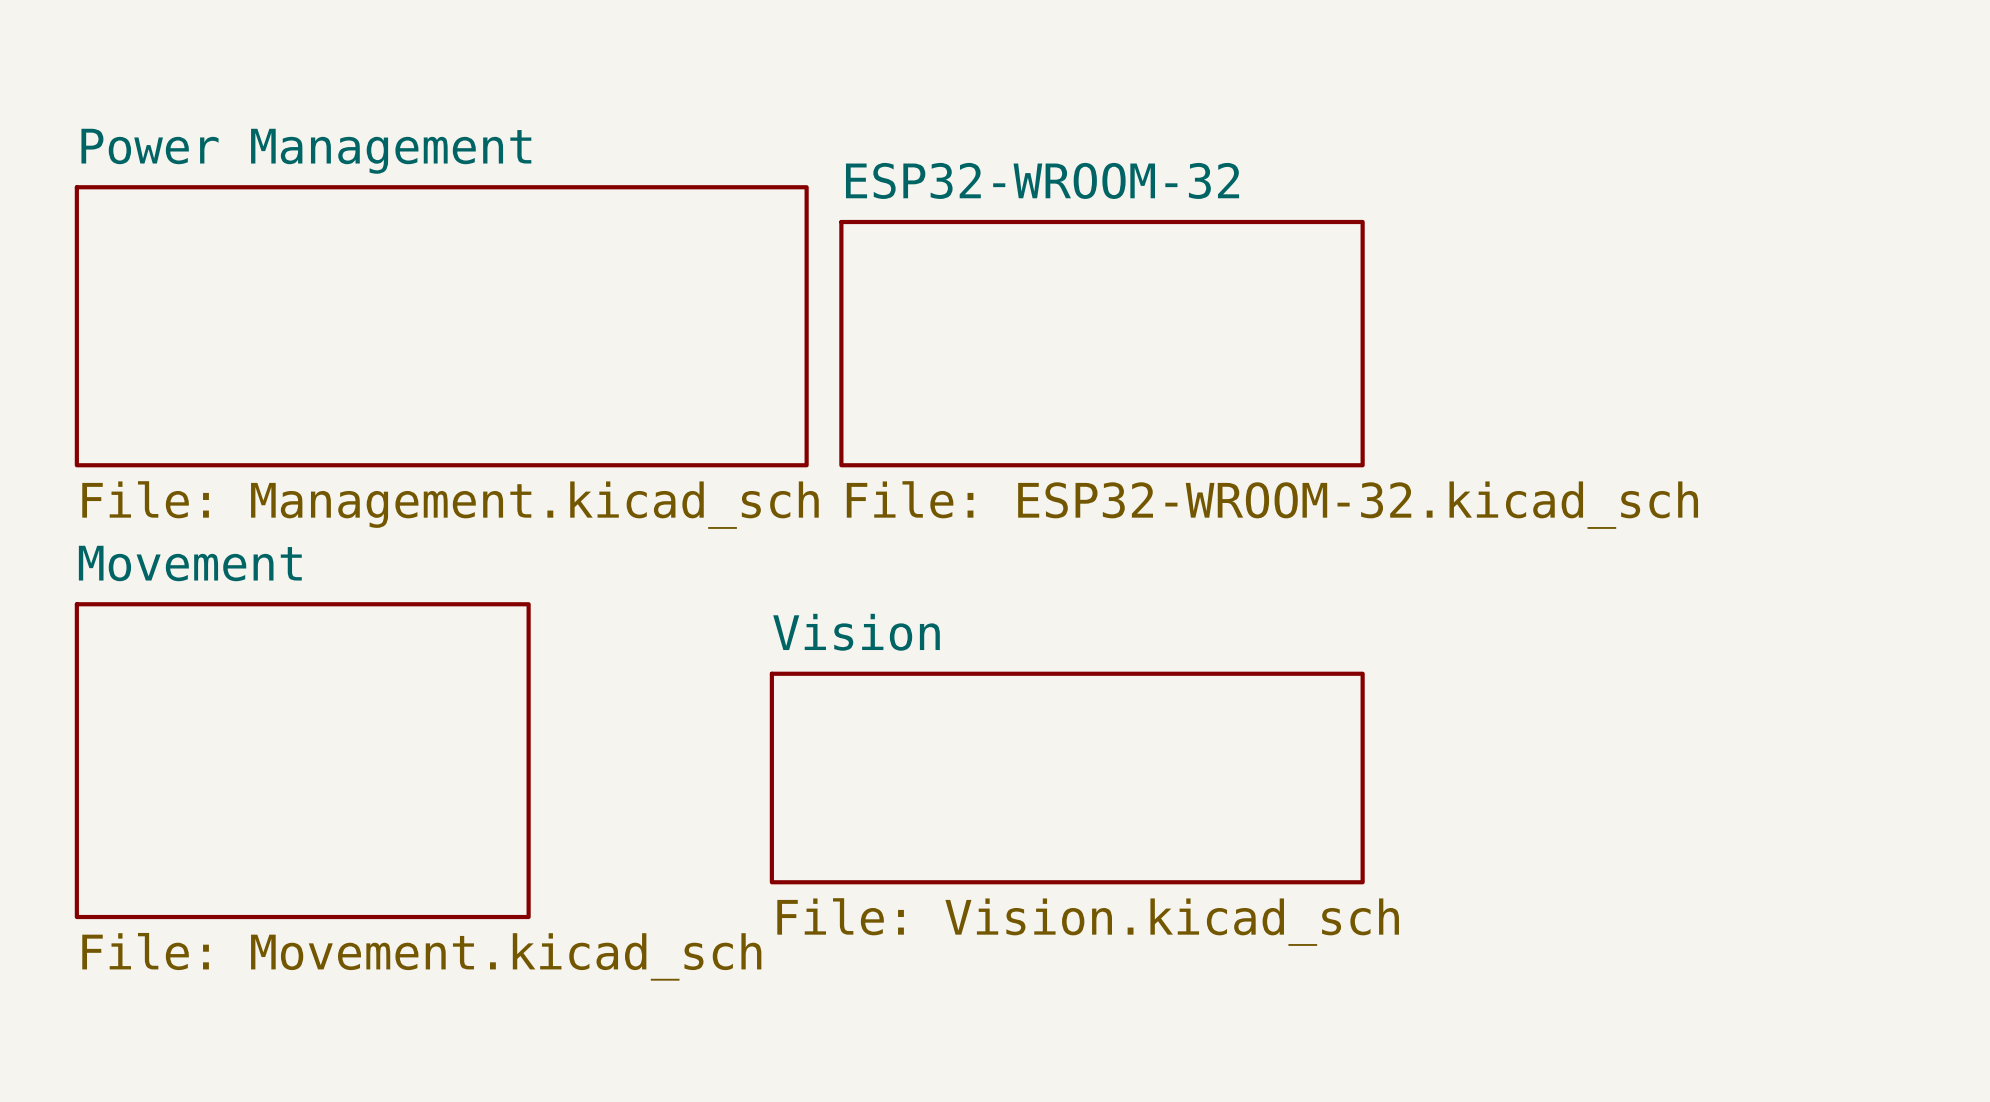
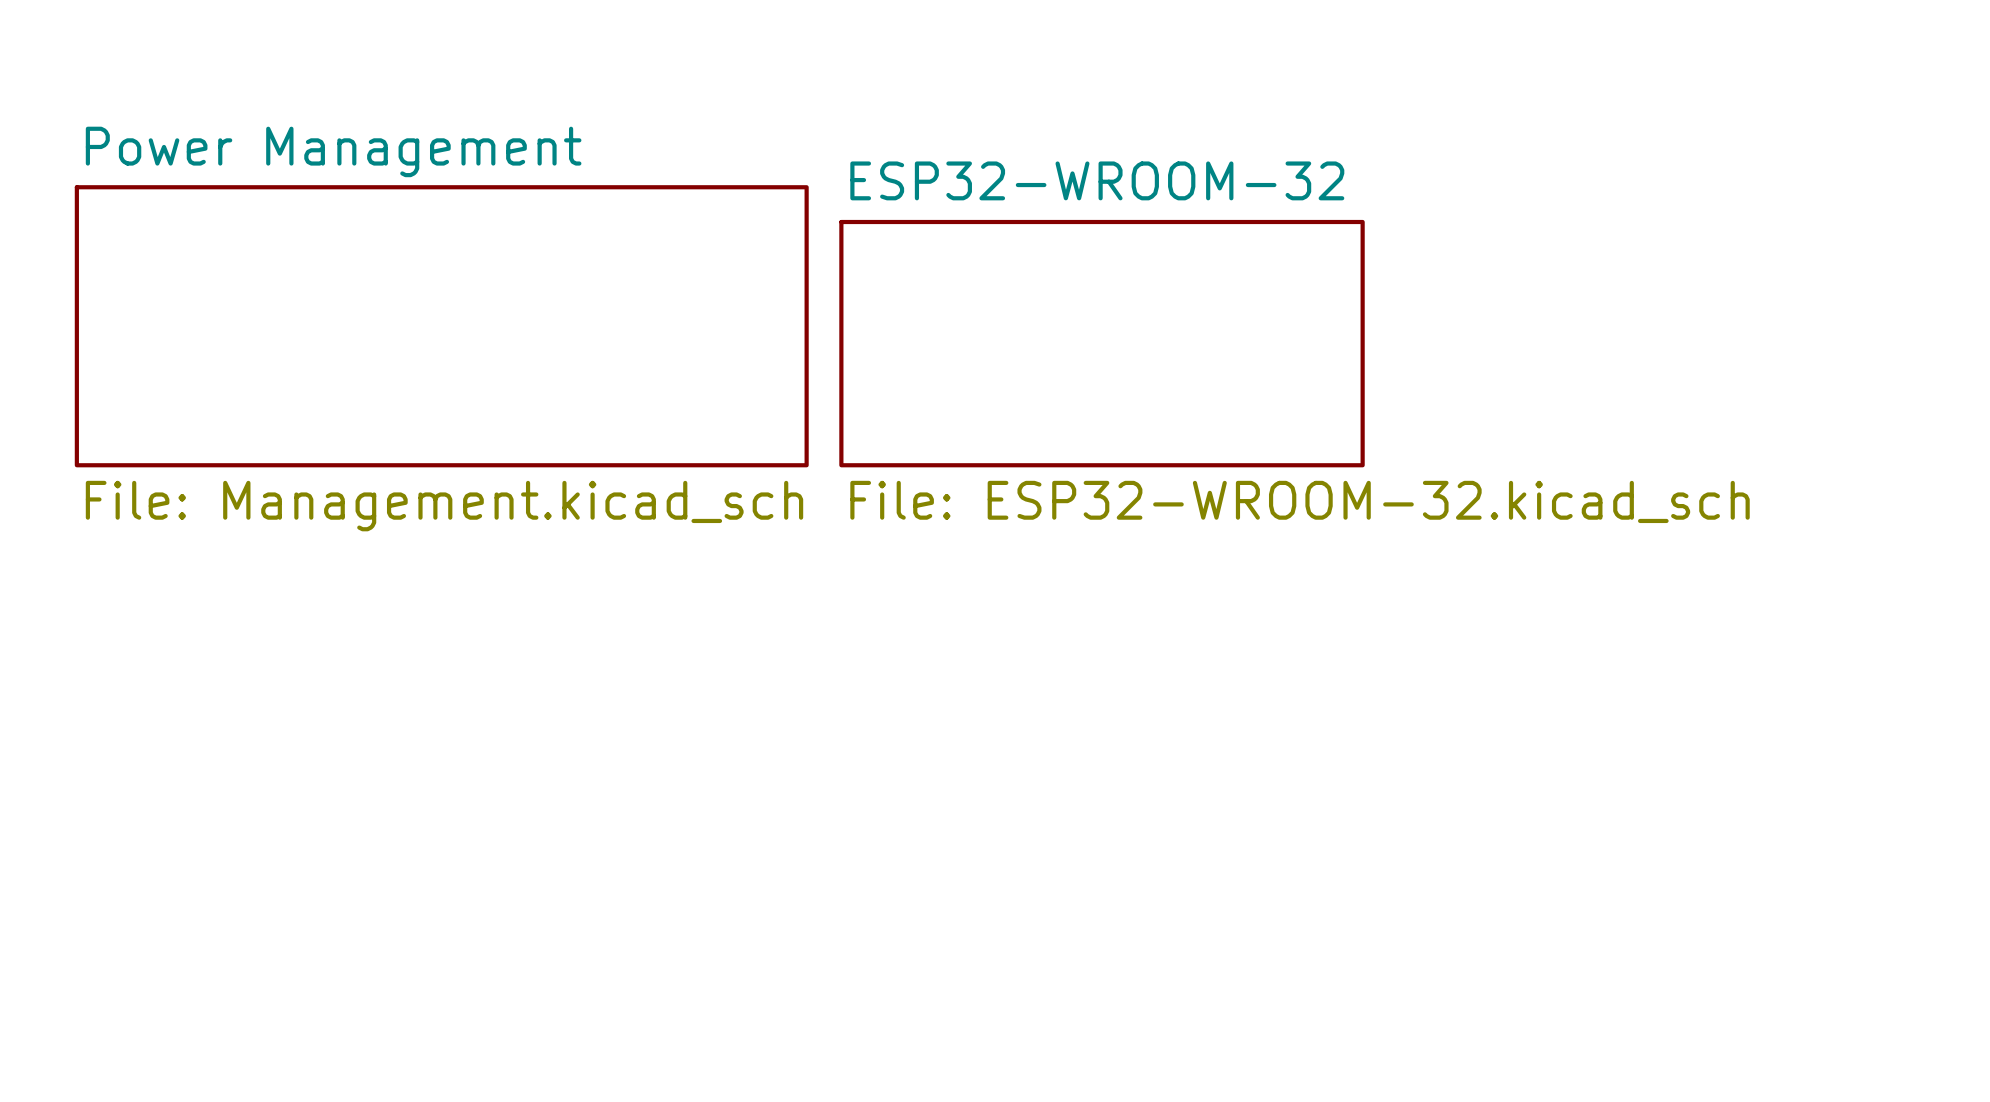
sheet Movement: File: Movement.kicad_sch (302, 760) -> none
sheet Vision: File: Vision.kicad_sch (1067, 778) -> none

